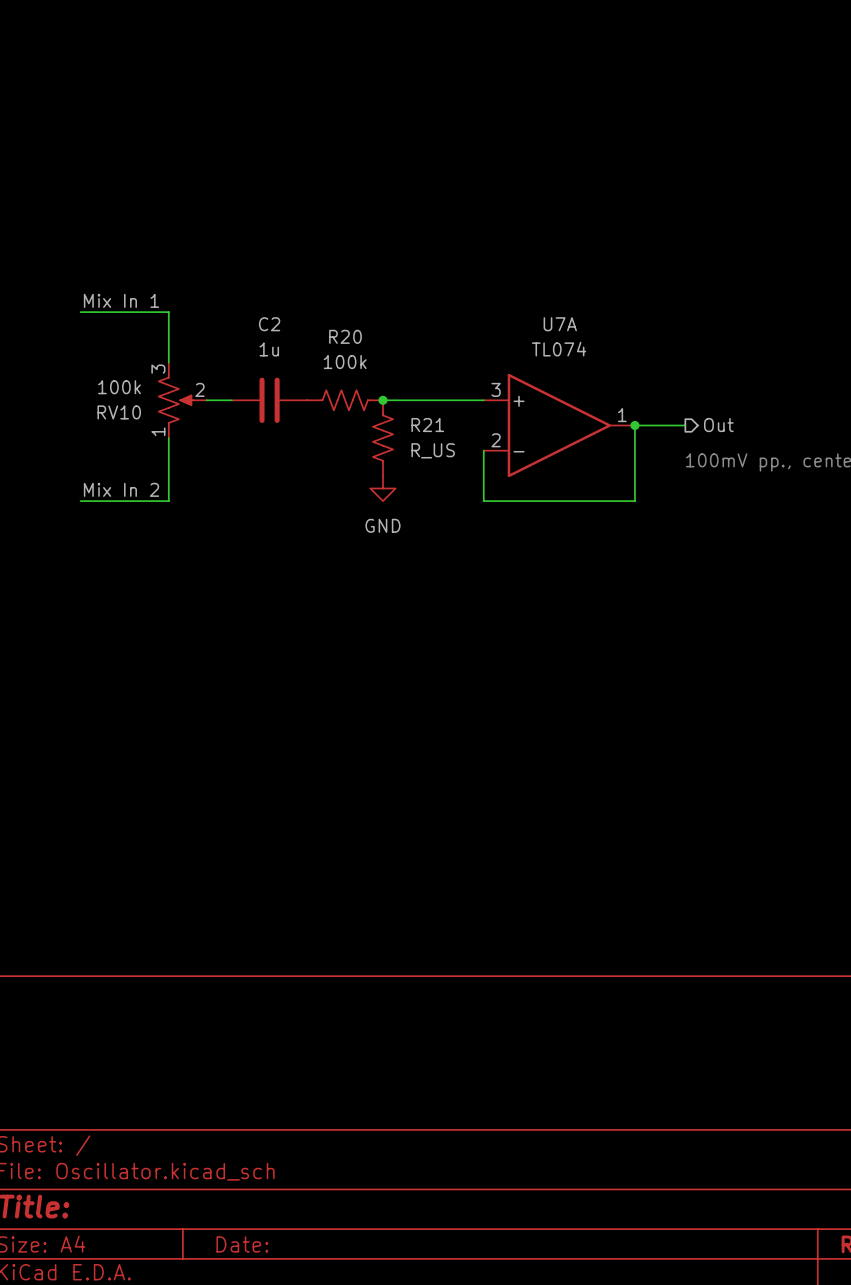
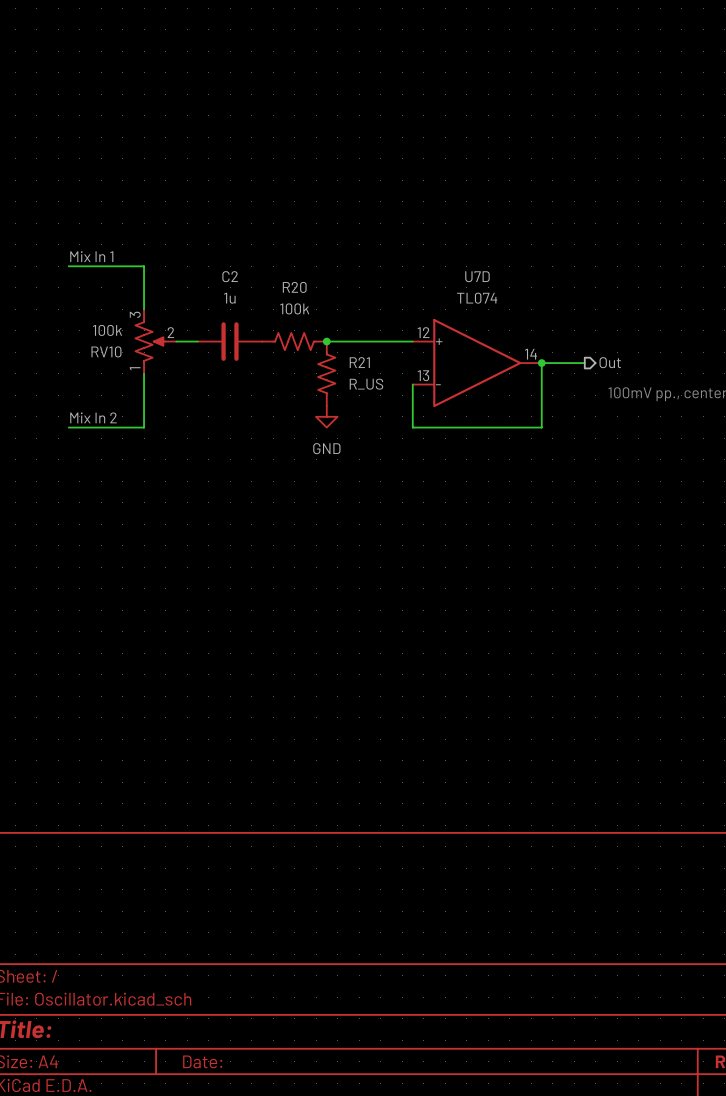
U7A name: U7A (560, 324) -> U7D (477, 276)
U7A pin number: 3 (496, 389) -> 12 (423, 332)
U7A pin number: 1 (622, 415) -> 14 (531, 354)
U7A pin number: 2 (496, 440) -> 13 (423, 375)

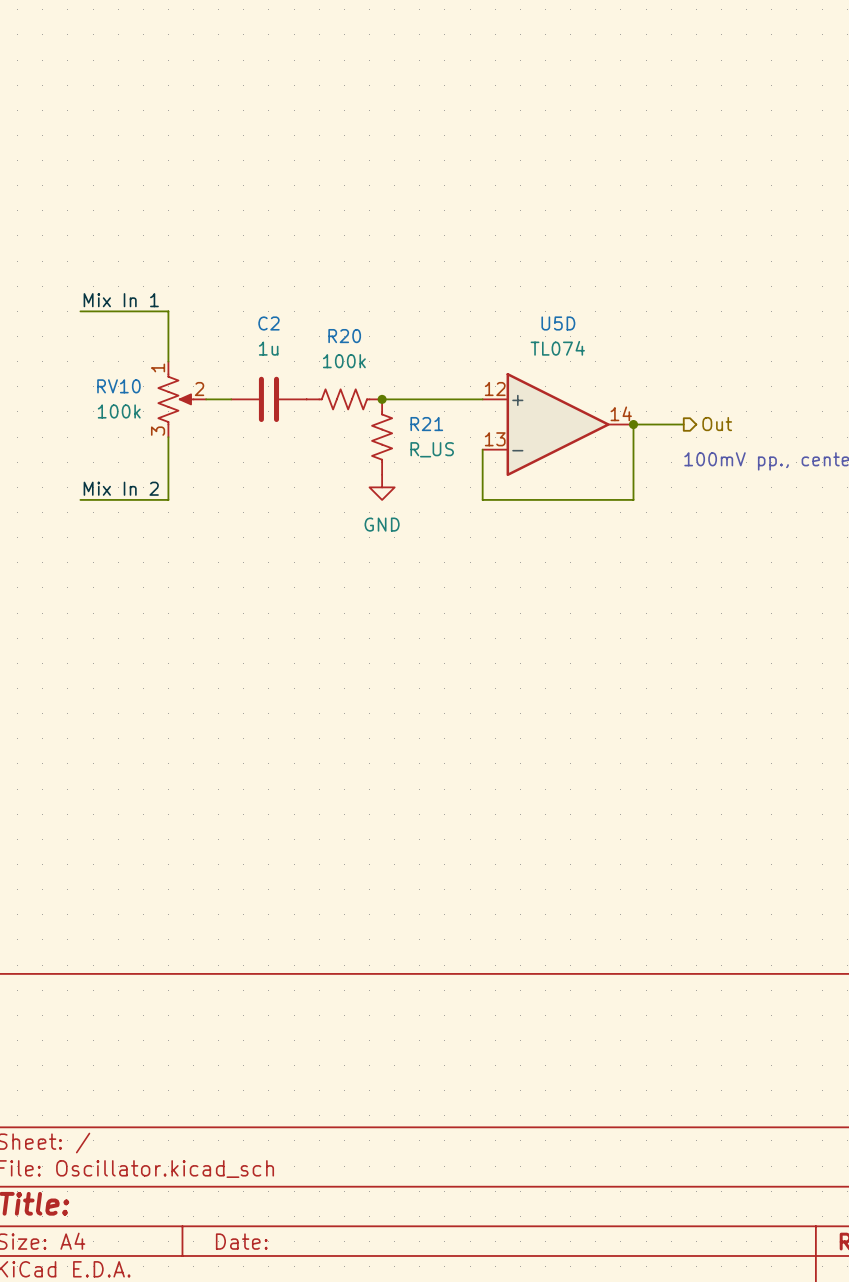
U7D name: U7D (477, 276) -> U5D (558, 323)
RV10 flip: as is (150, 341) -> up-down (175, 399)

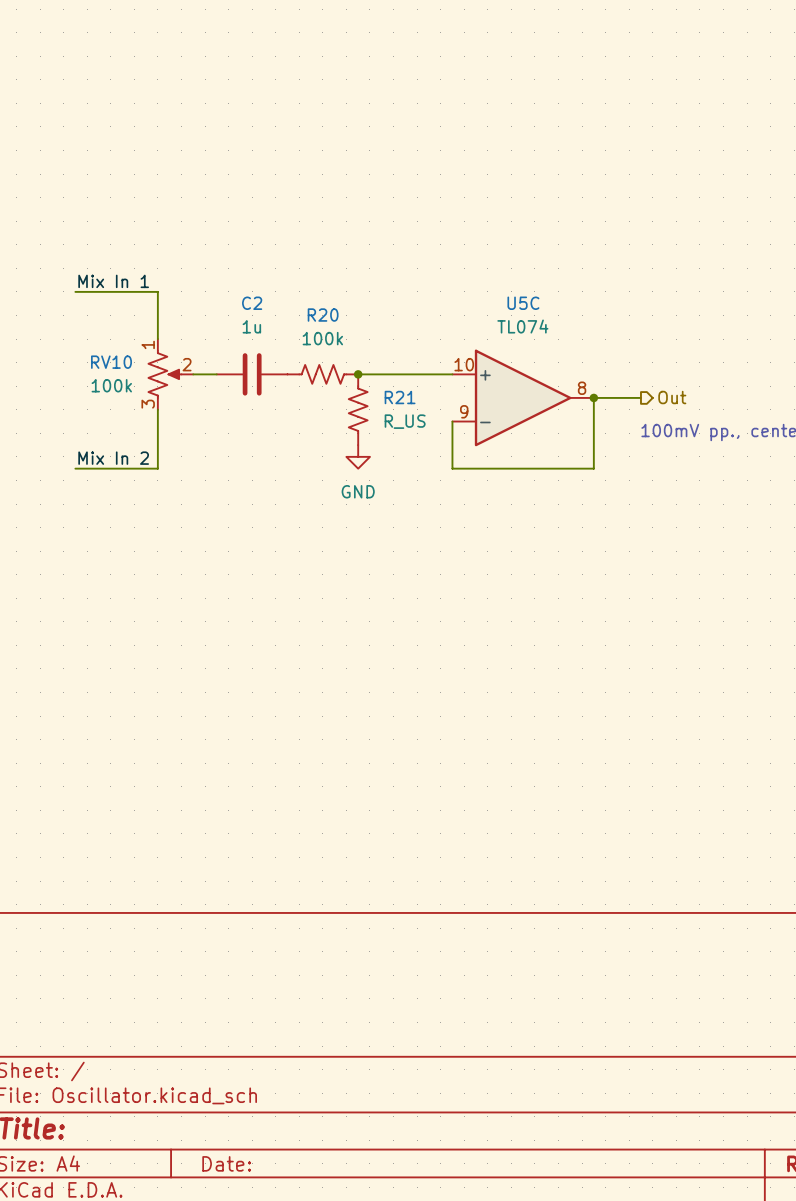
U5D name: U5D (558, 323) -> U5C (523, 303)
U5D pin number: 12 (495, 389) -> 10 (464, 364)
U5D pin number: 14 (621, 413) -> 8 (582, 388)
U5D pin number: 13 (495, 439) -> 9 (464, 411)

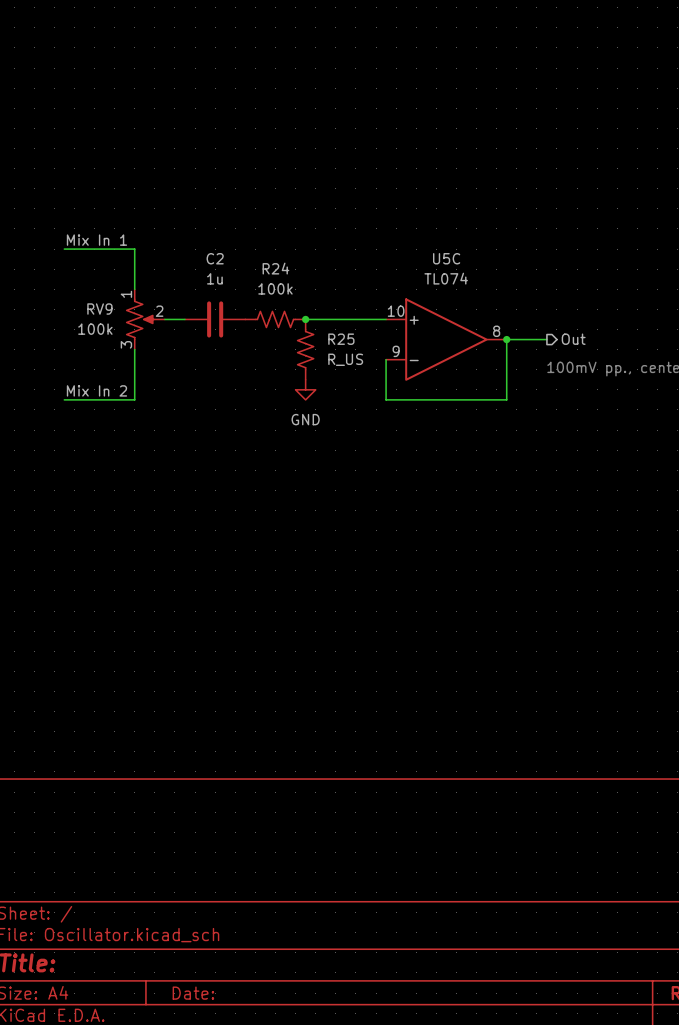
R20 name: R20 (323, 315) -> R24 (275, 268)
RV10 name: RV10 (111, 362) -> RV9 (99, 309)
R21 name: R21 (400, 397) -> R25 (341, 339)

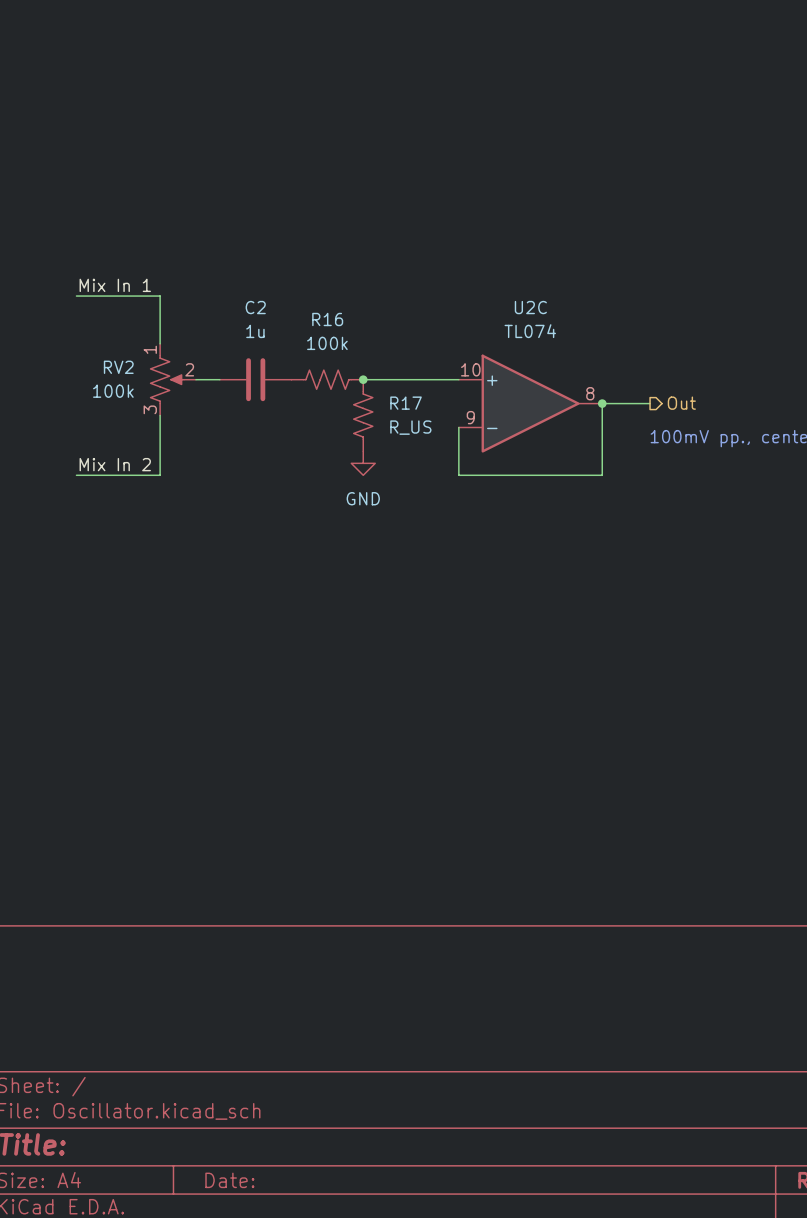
U5C name: U5C (446, 258) -> U2C (530, 307)
R24 name: R24 (275, 268) -> R16 (327, 319)
RV9 name: RV9 (99, 309) -> RV2 (118, 367)
R25 name: R25 (341, 339) -> R17 (406, 403)

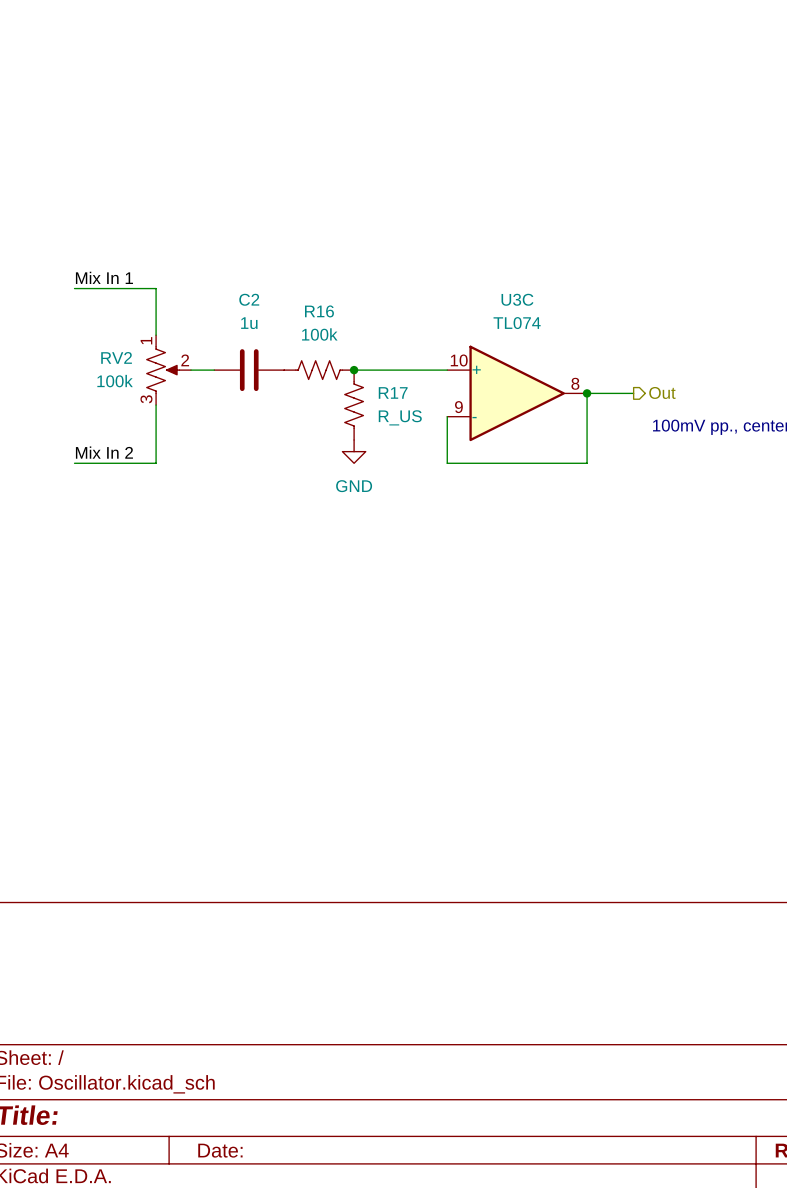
U2C name: U2C (530, 307) -> U3C (517, 299)

